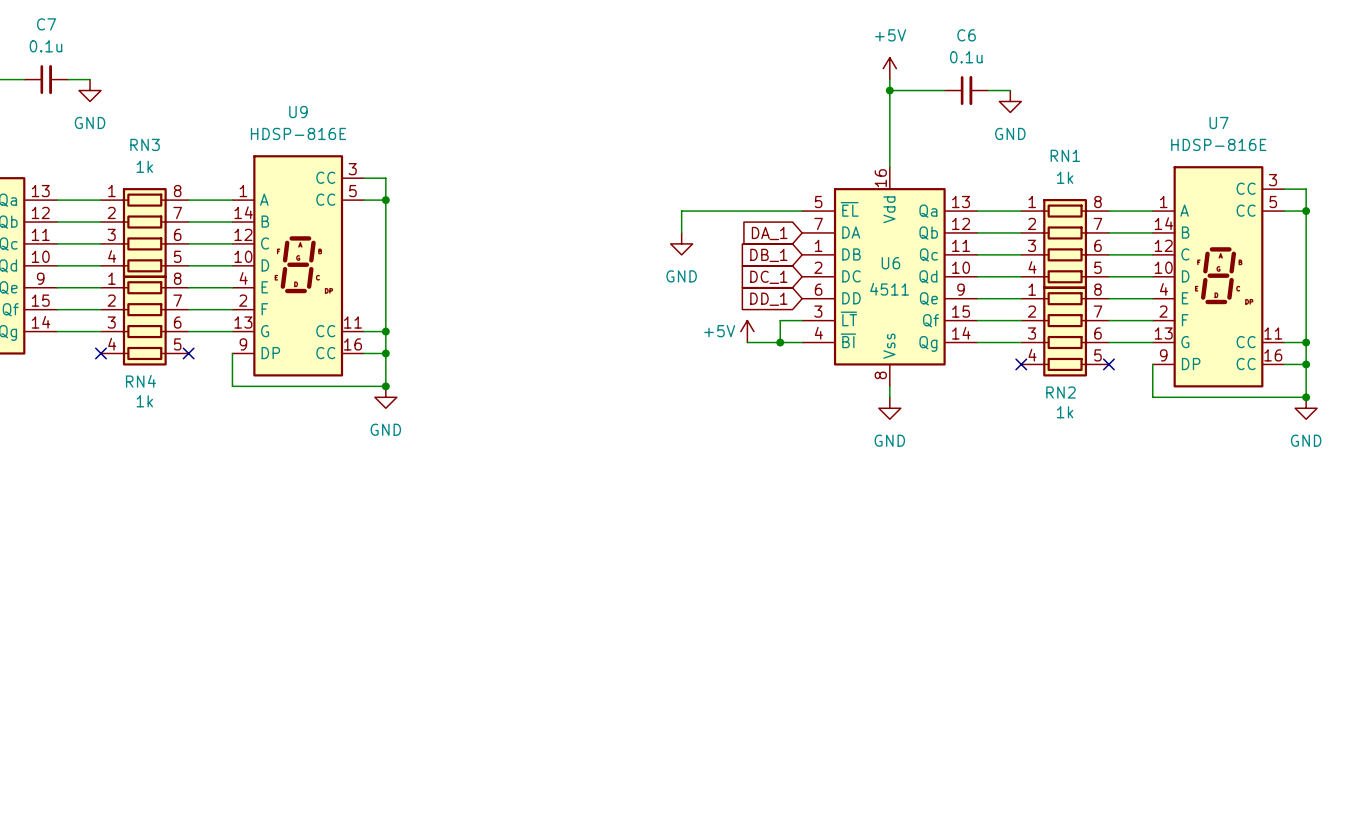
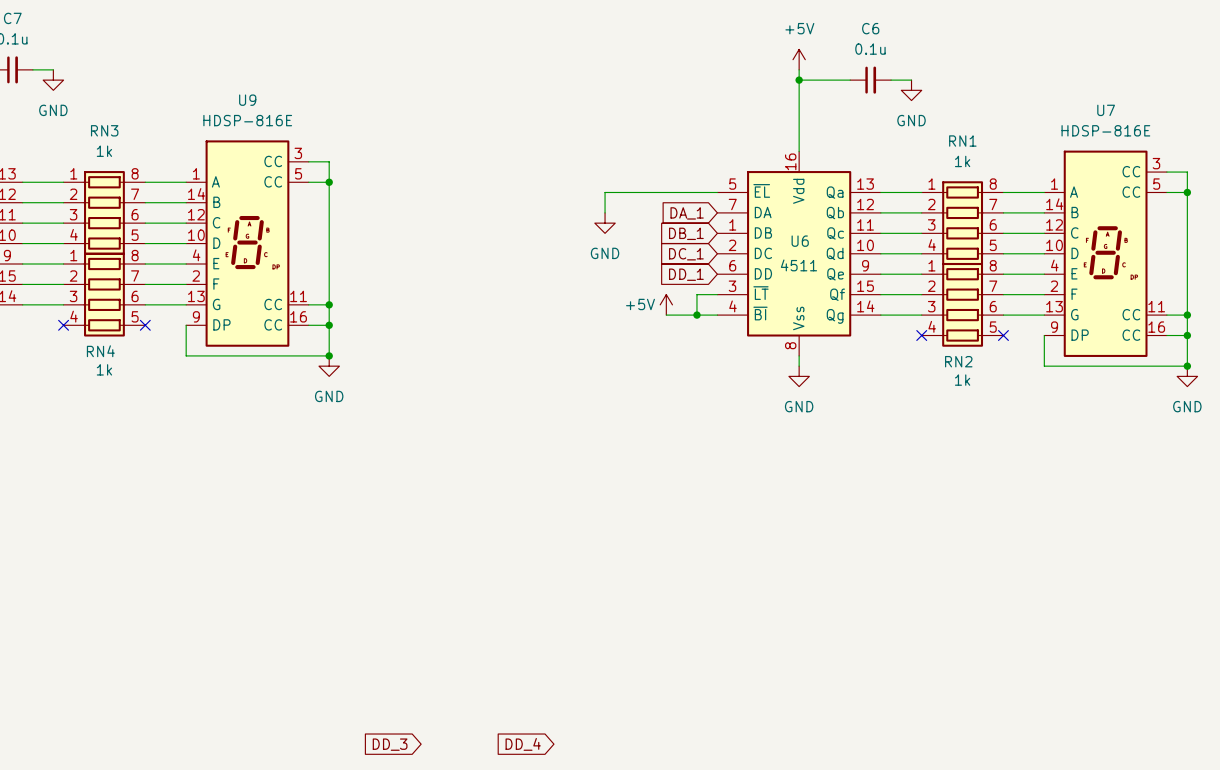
global label: none -> DD_4 (523, 744)
global label: none -> DD_3 (390, 744)

